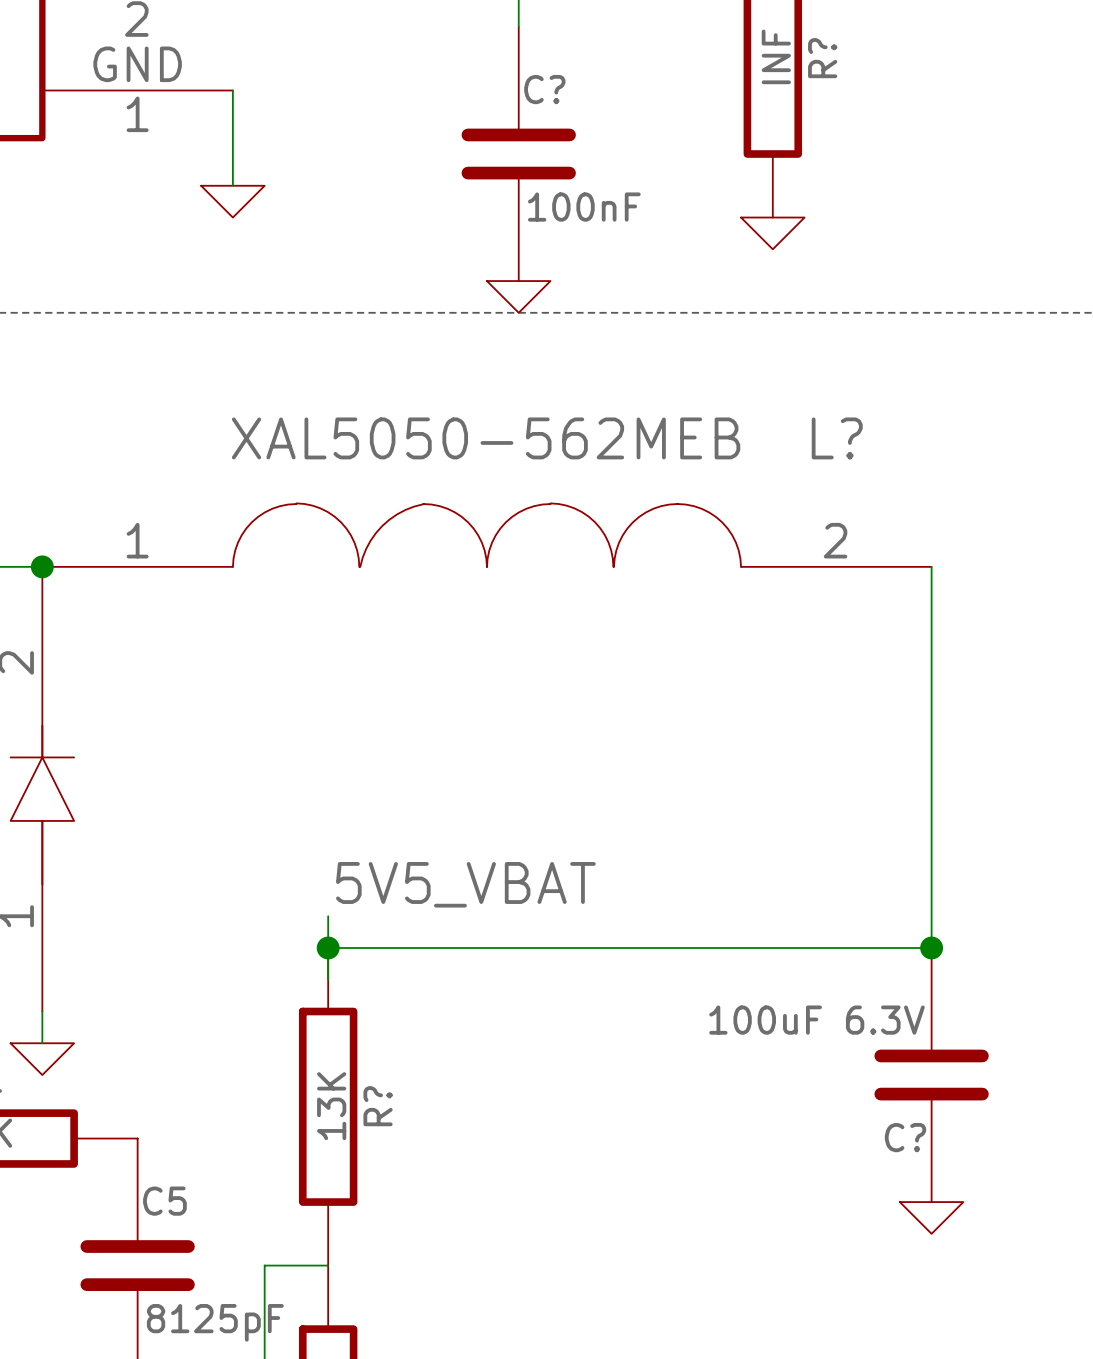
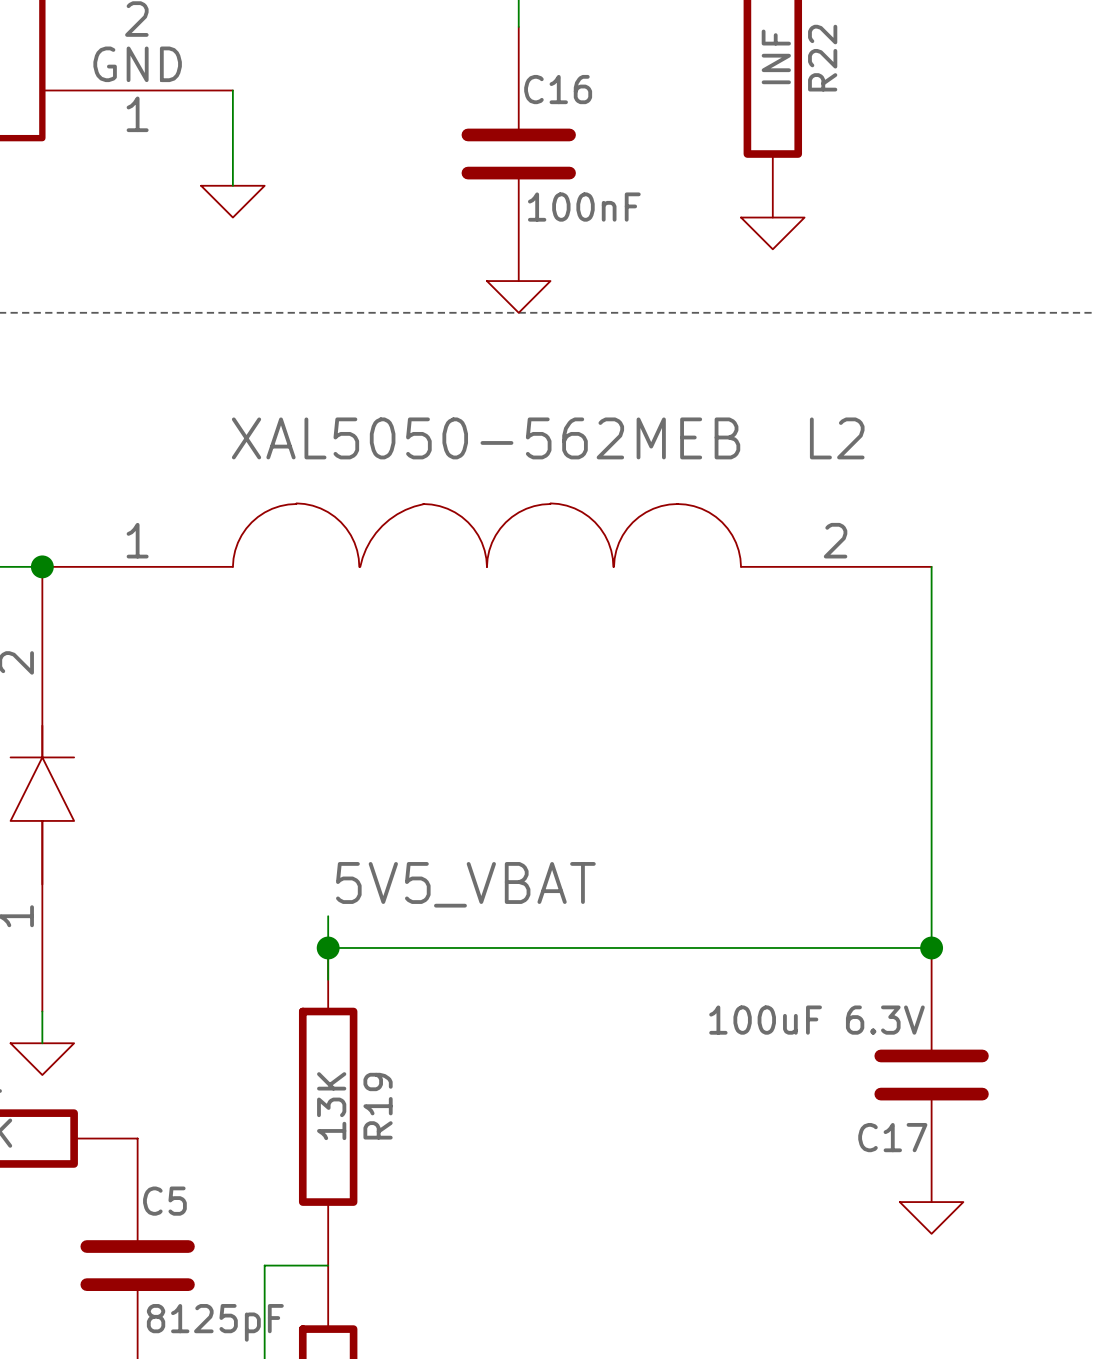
R? name: R? (822, 58) -> R22 (822, 58)
C? name: C? (544, 89) -> C16 (558, 89)
L? name: L? (837, 438) -> L2 (837, 438)
R? name: R? (378, 1106) -> R19 (378, 1106)
C? name: C? (905, 1137) -> C17 (892, 1137)

